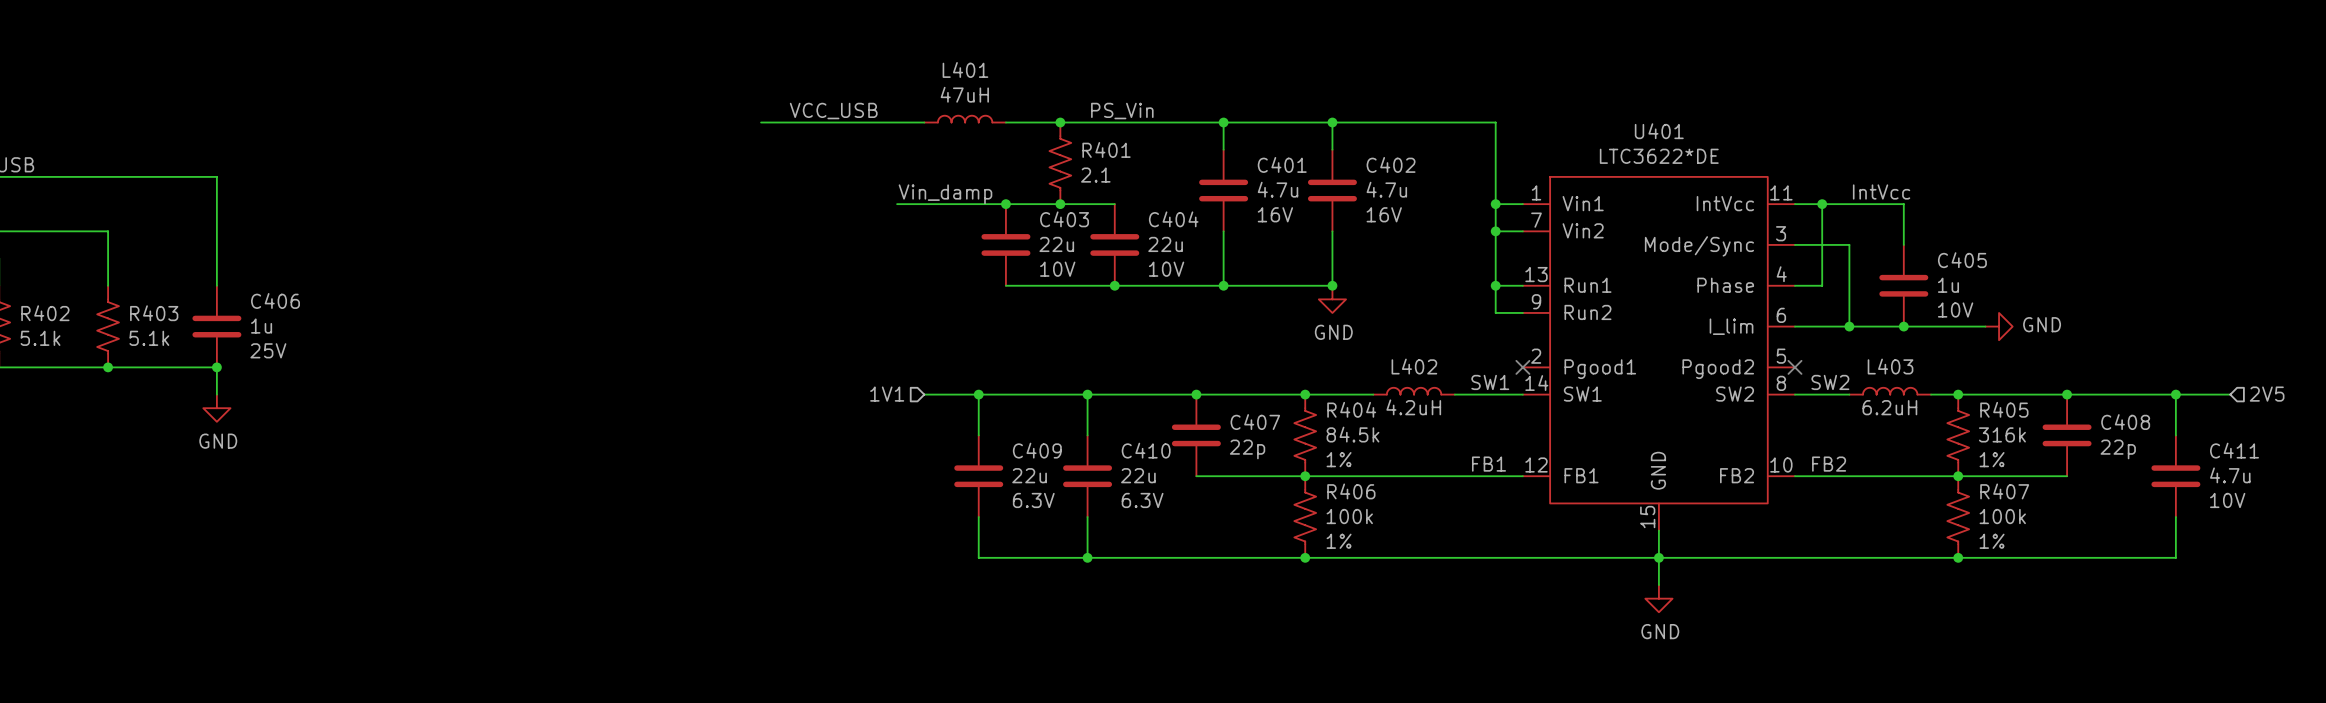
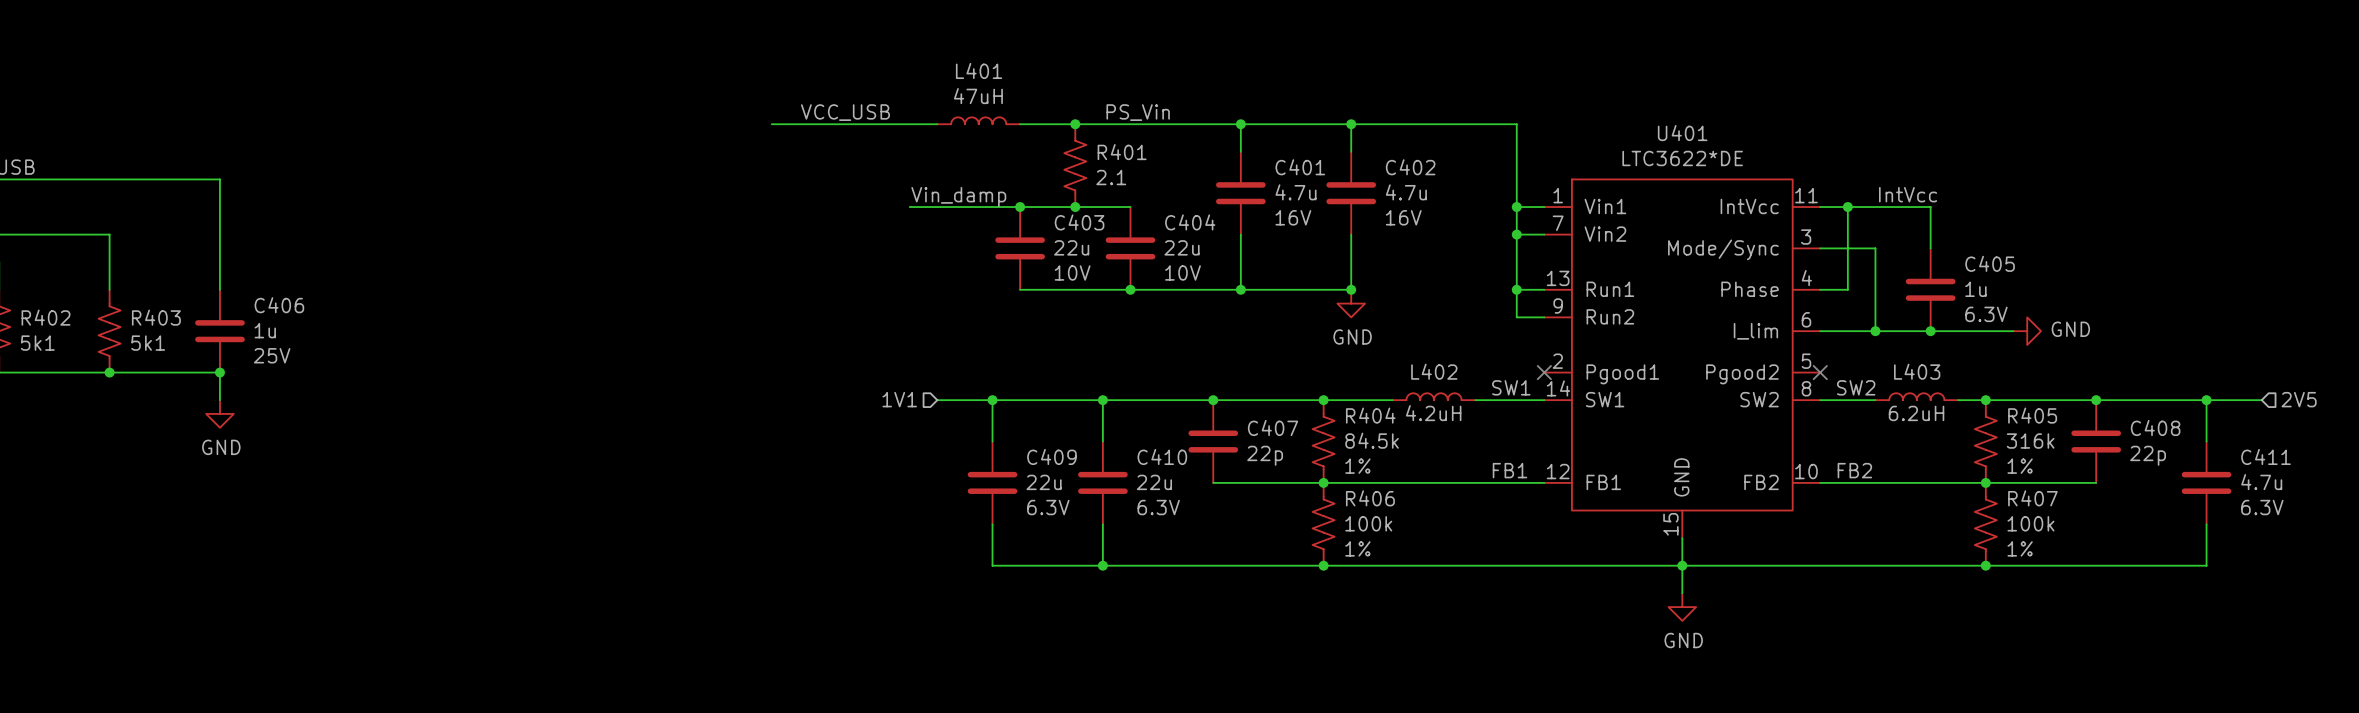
C405 text: 10V (1955, 310) -> 6.3V (1986, 314)
R402 value: 5.1k (40, 338) -> 5k1 (37, 343)
R403 value: 5.1k (149, 338) -> 5k1 (148, 343)
C411 text: 10V (2227, 500) -> 6.3V (2262, 507)

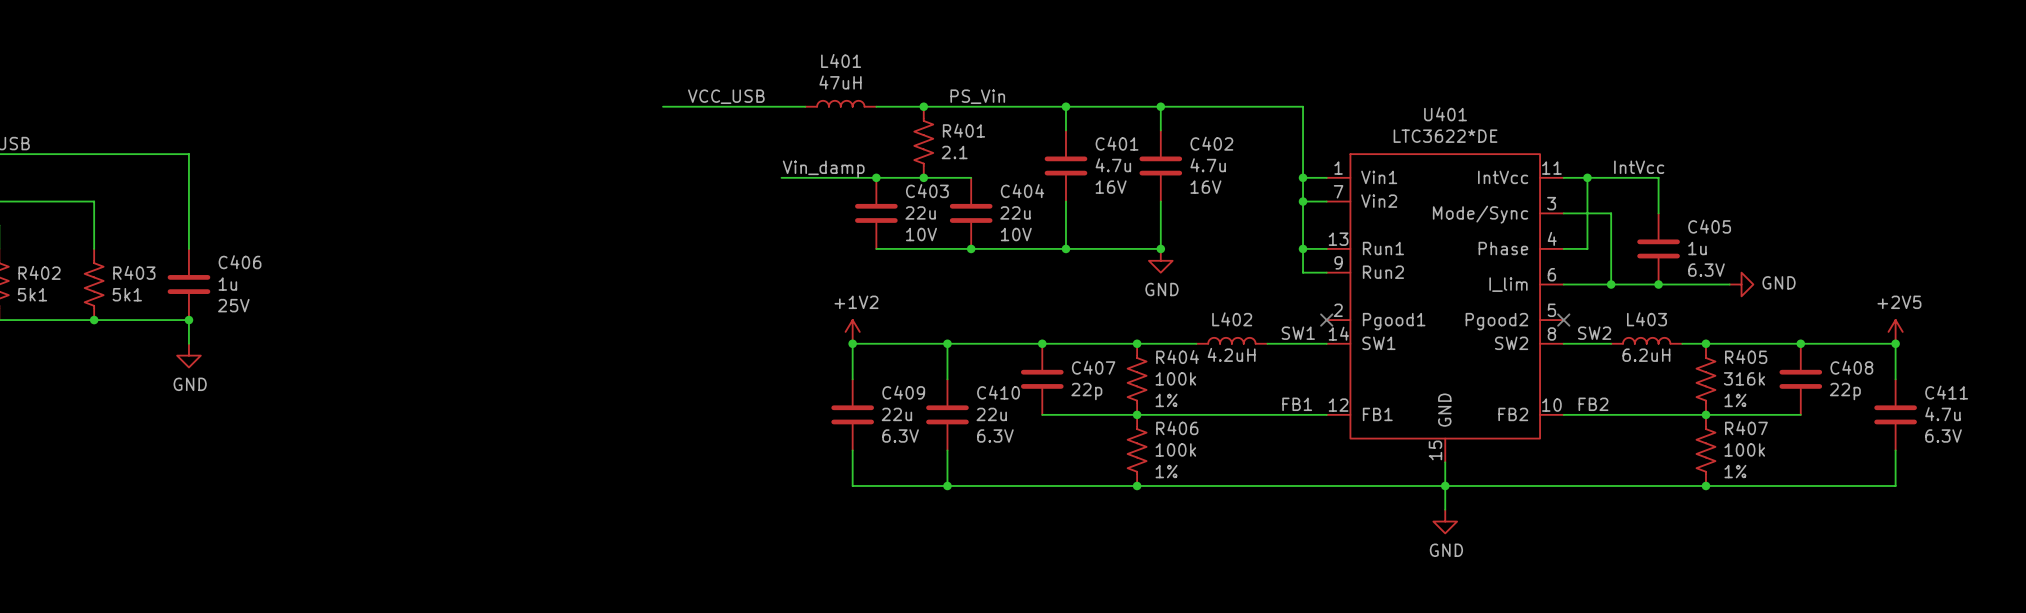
power symbol: none -> +1V2 (852, 331)
power symbol: none -> +2V5 (1895, 331)
hierarchical label: 1V1 (899, 399) -> none
hierarchical label: 2V5 (2299, 399) -> none
wire: (937, 400) (992, 400) -> none
wire: (2206, 400) (2261, 400) -> none
R404 value: 84.5k (1372, 440) -> 100k (1175, 378)

